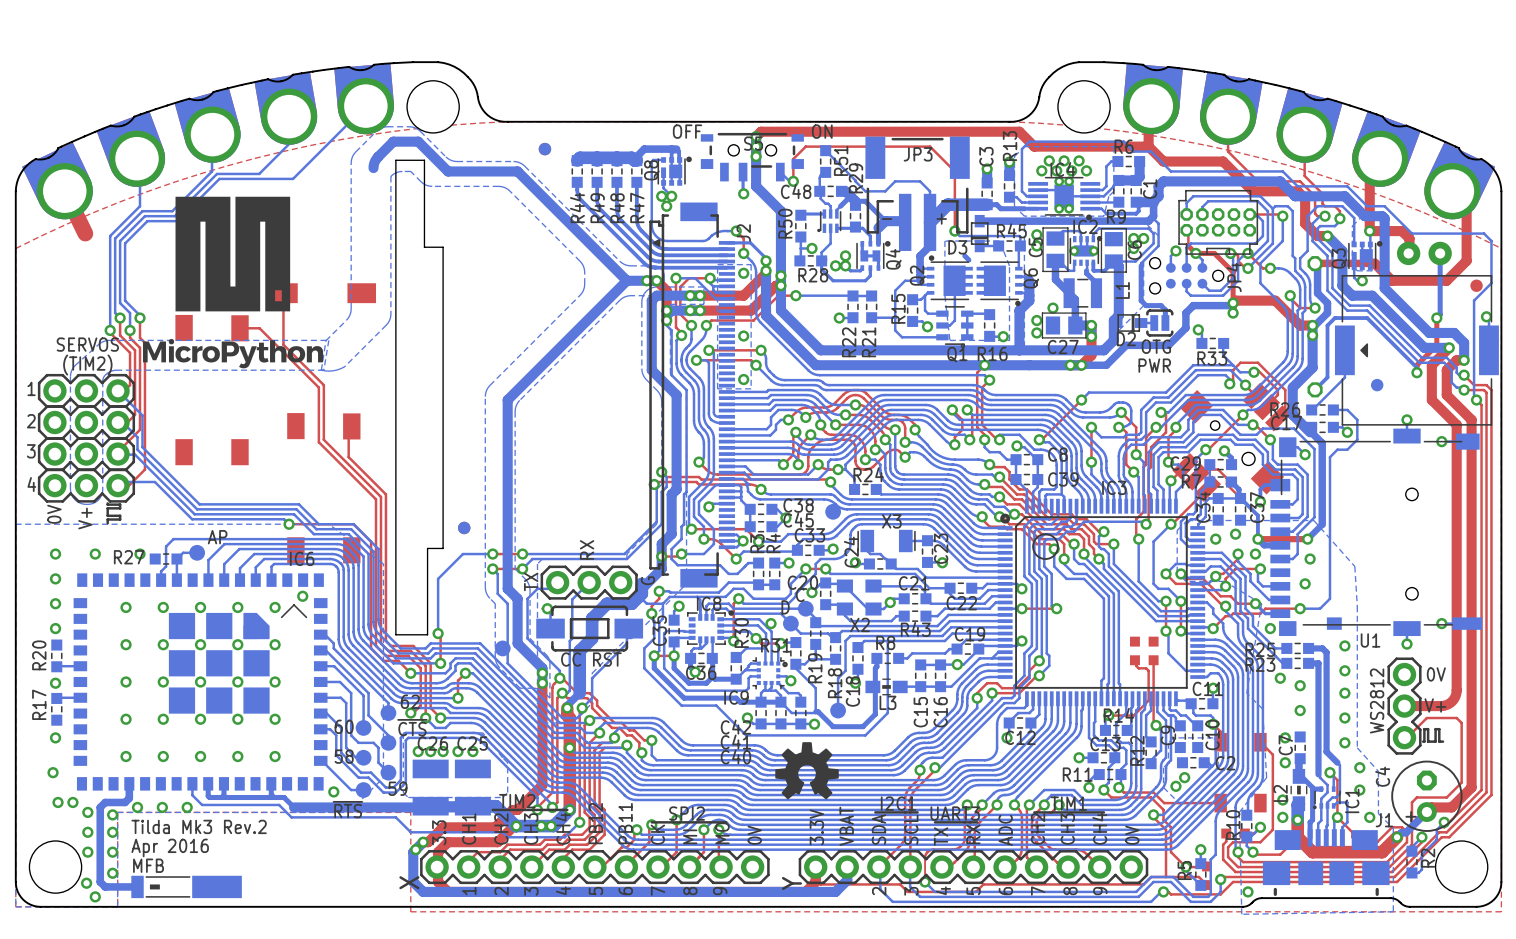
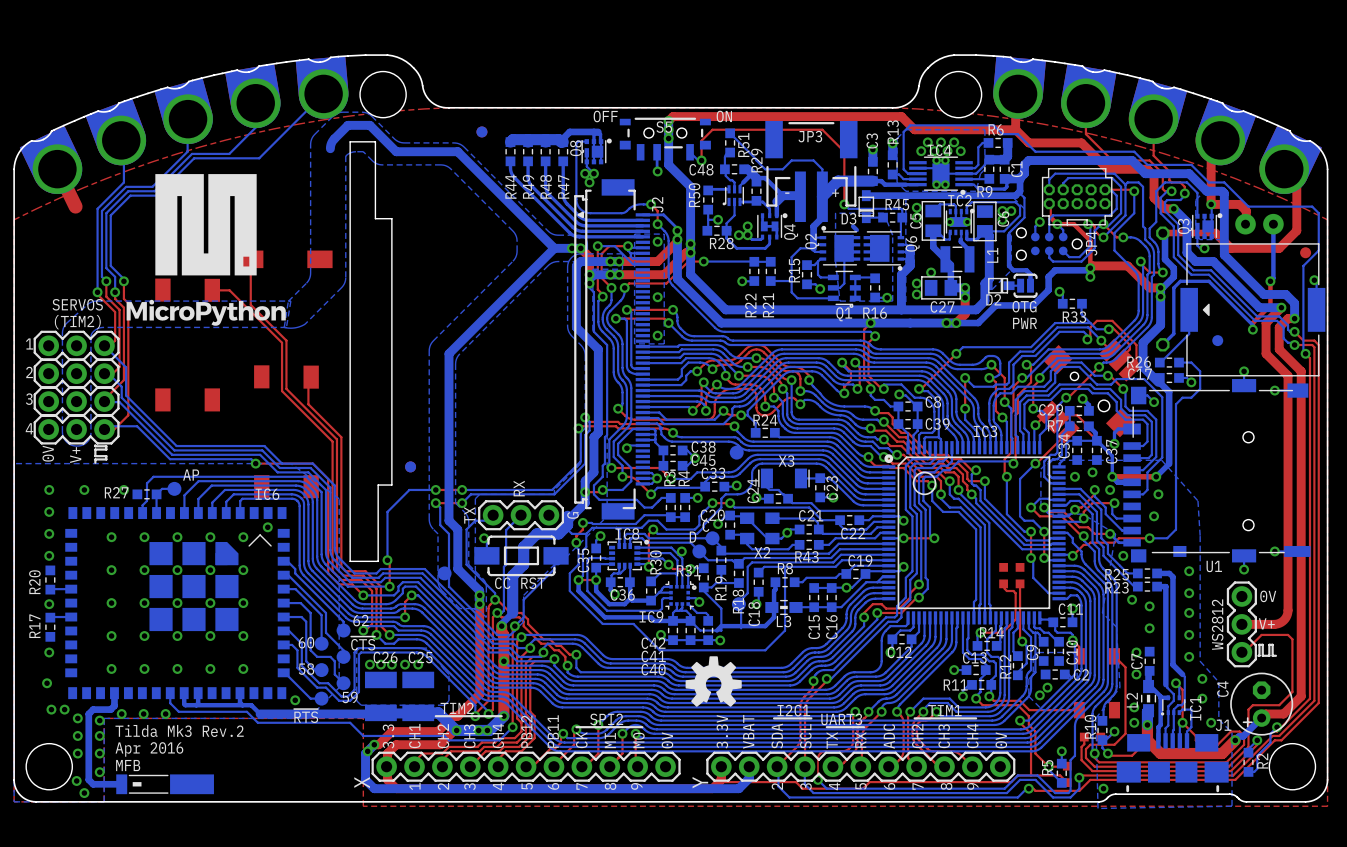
bottom track: (875, 698) (875, 714) (862, 726) (833, 726) (818, 711) (815, 711) -> (774, 617) (765, 626) (721, 626) (716, 630)
part position: (838, 710) -> (738, 604)

